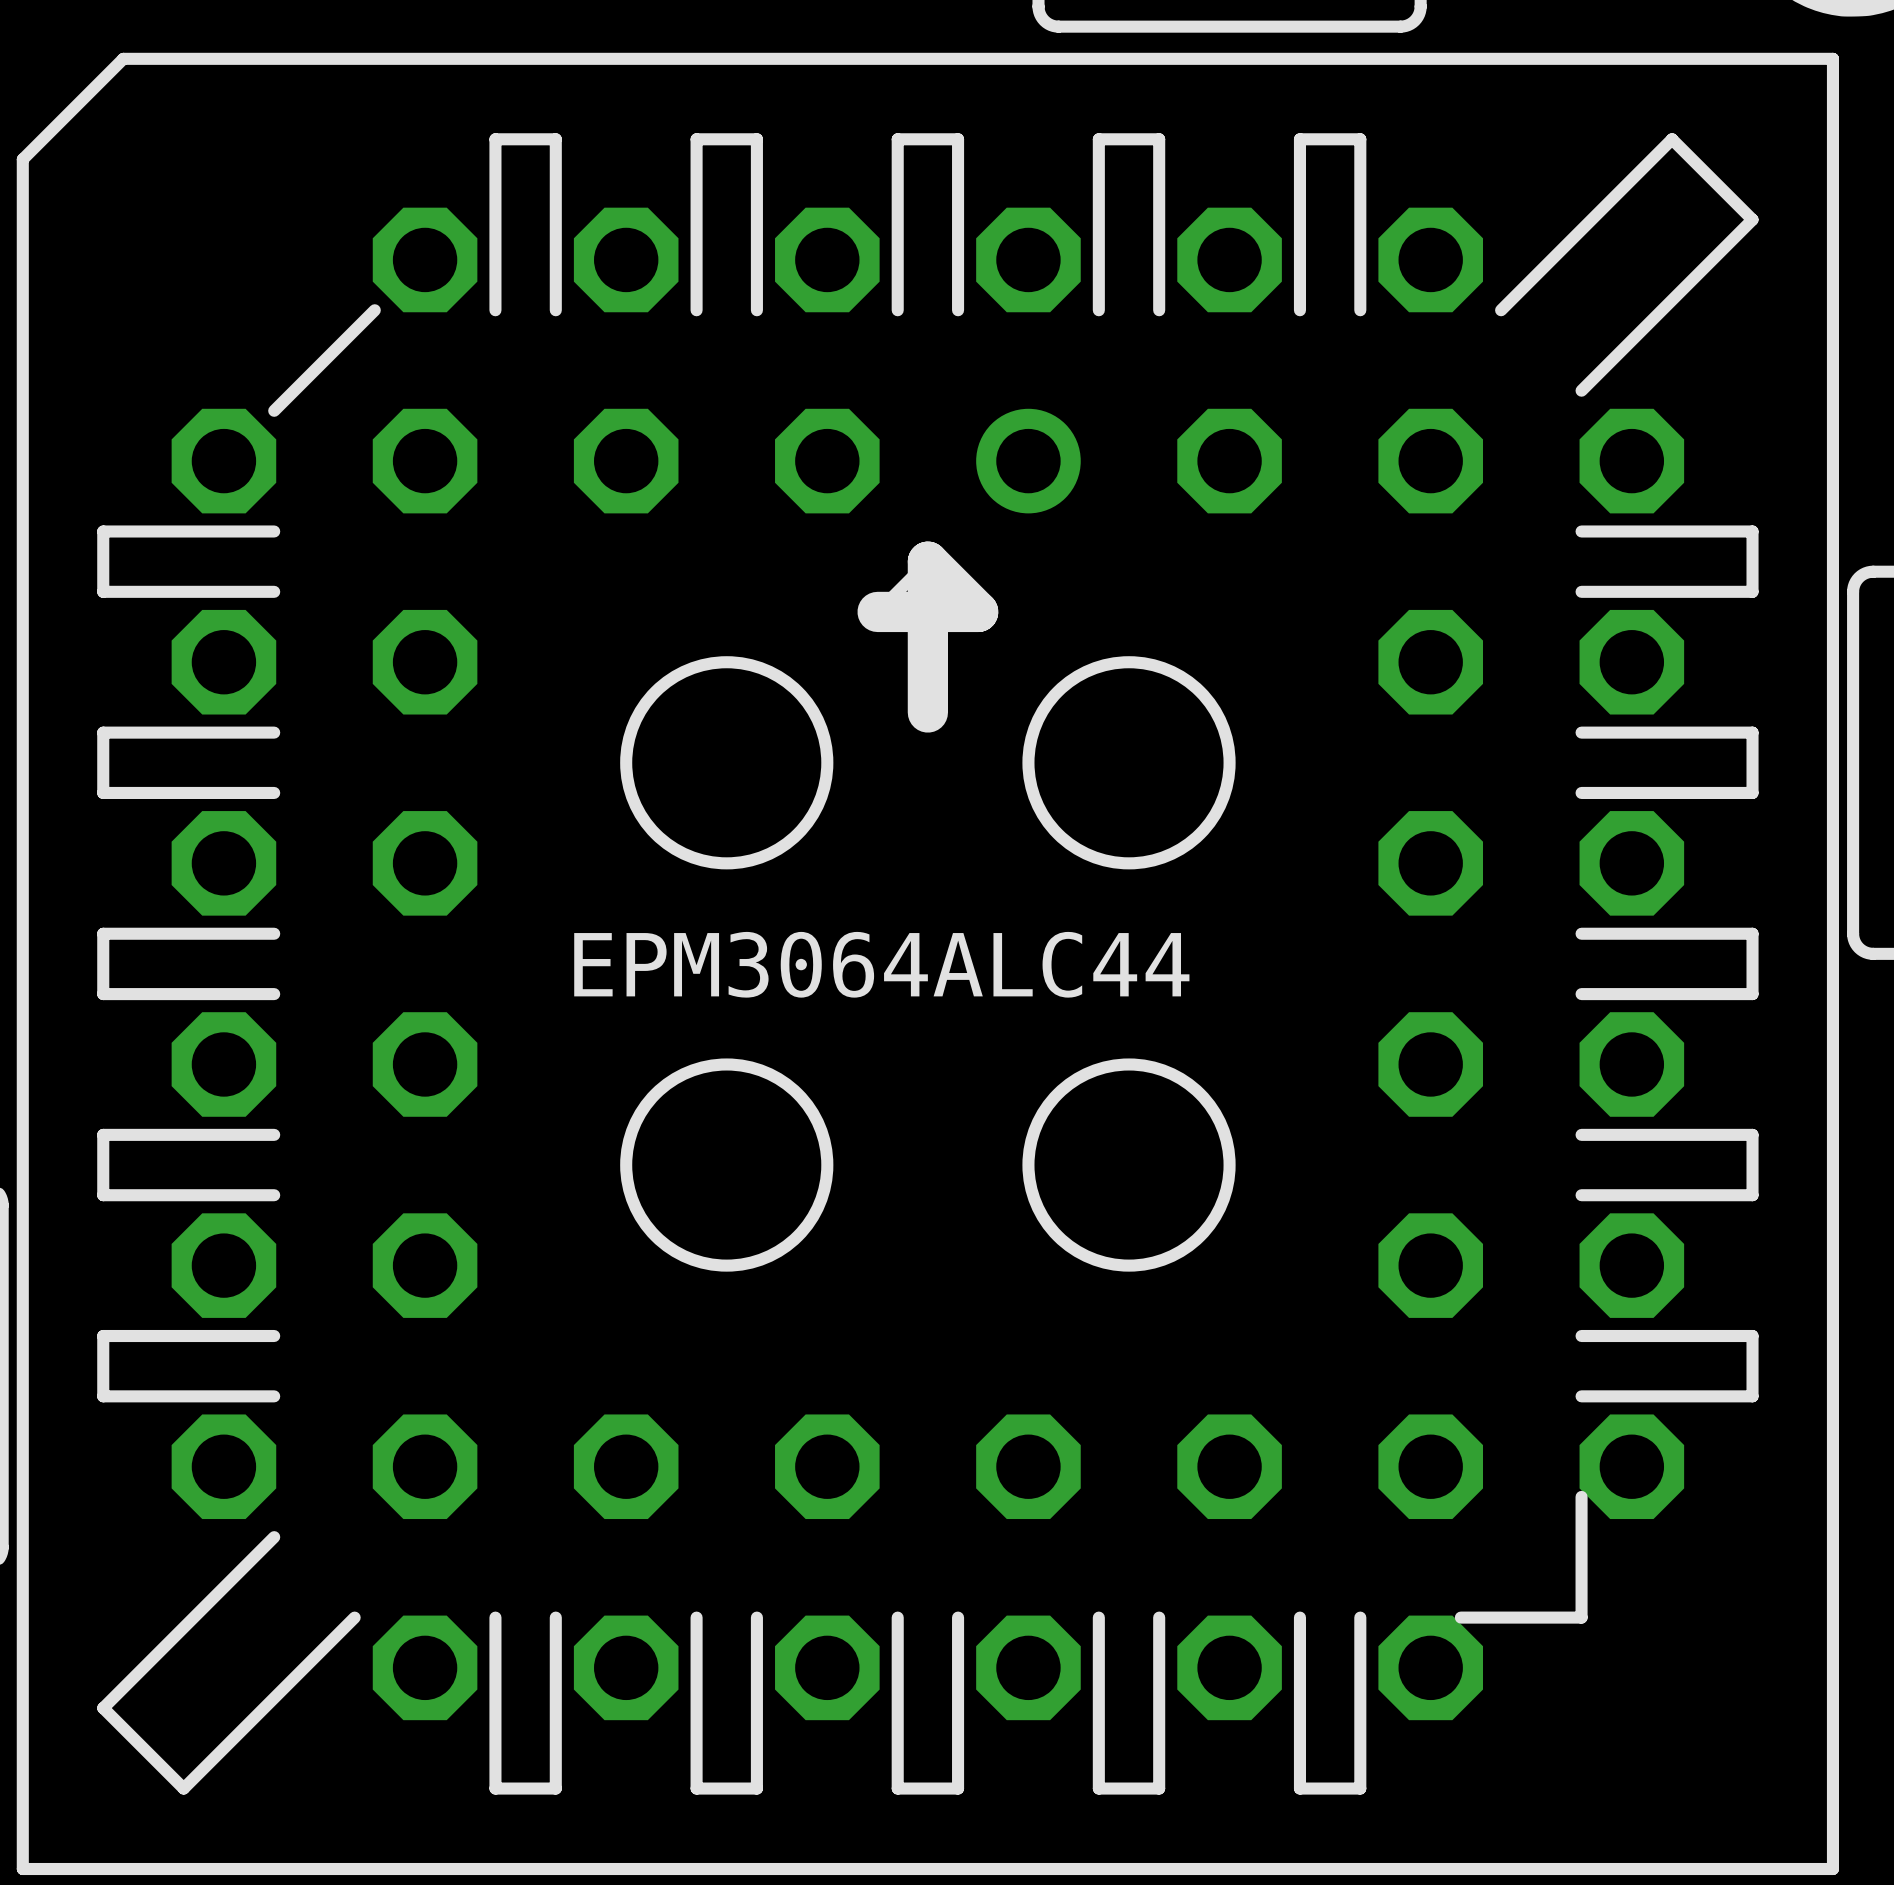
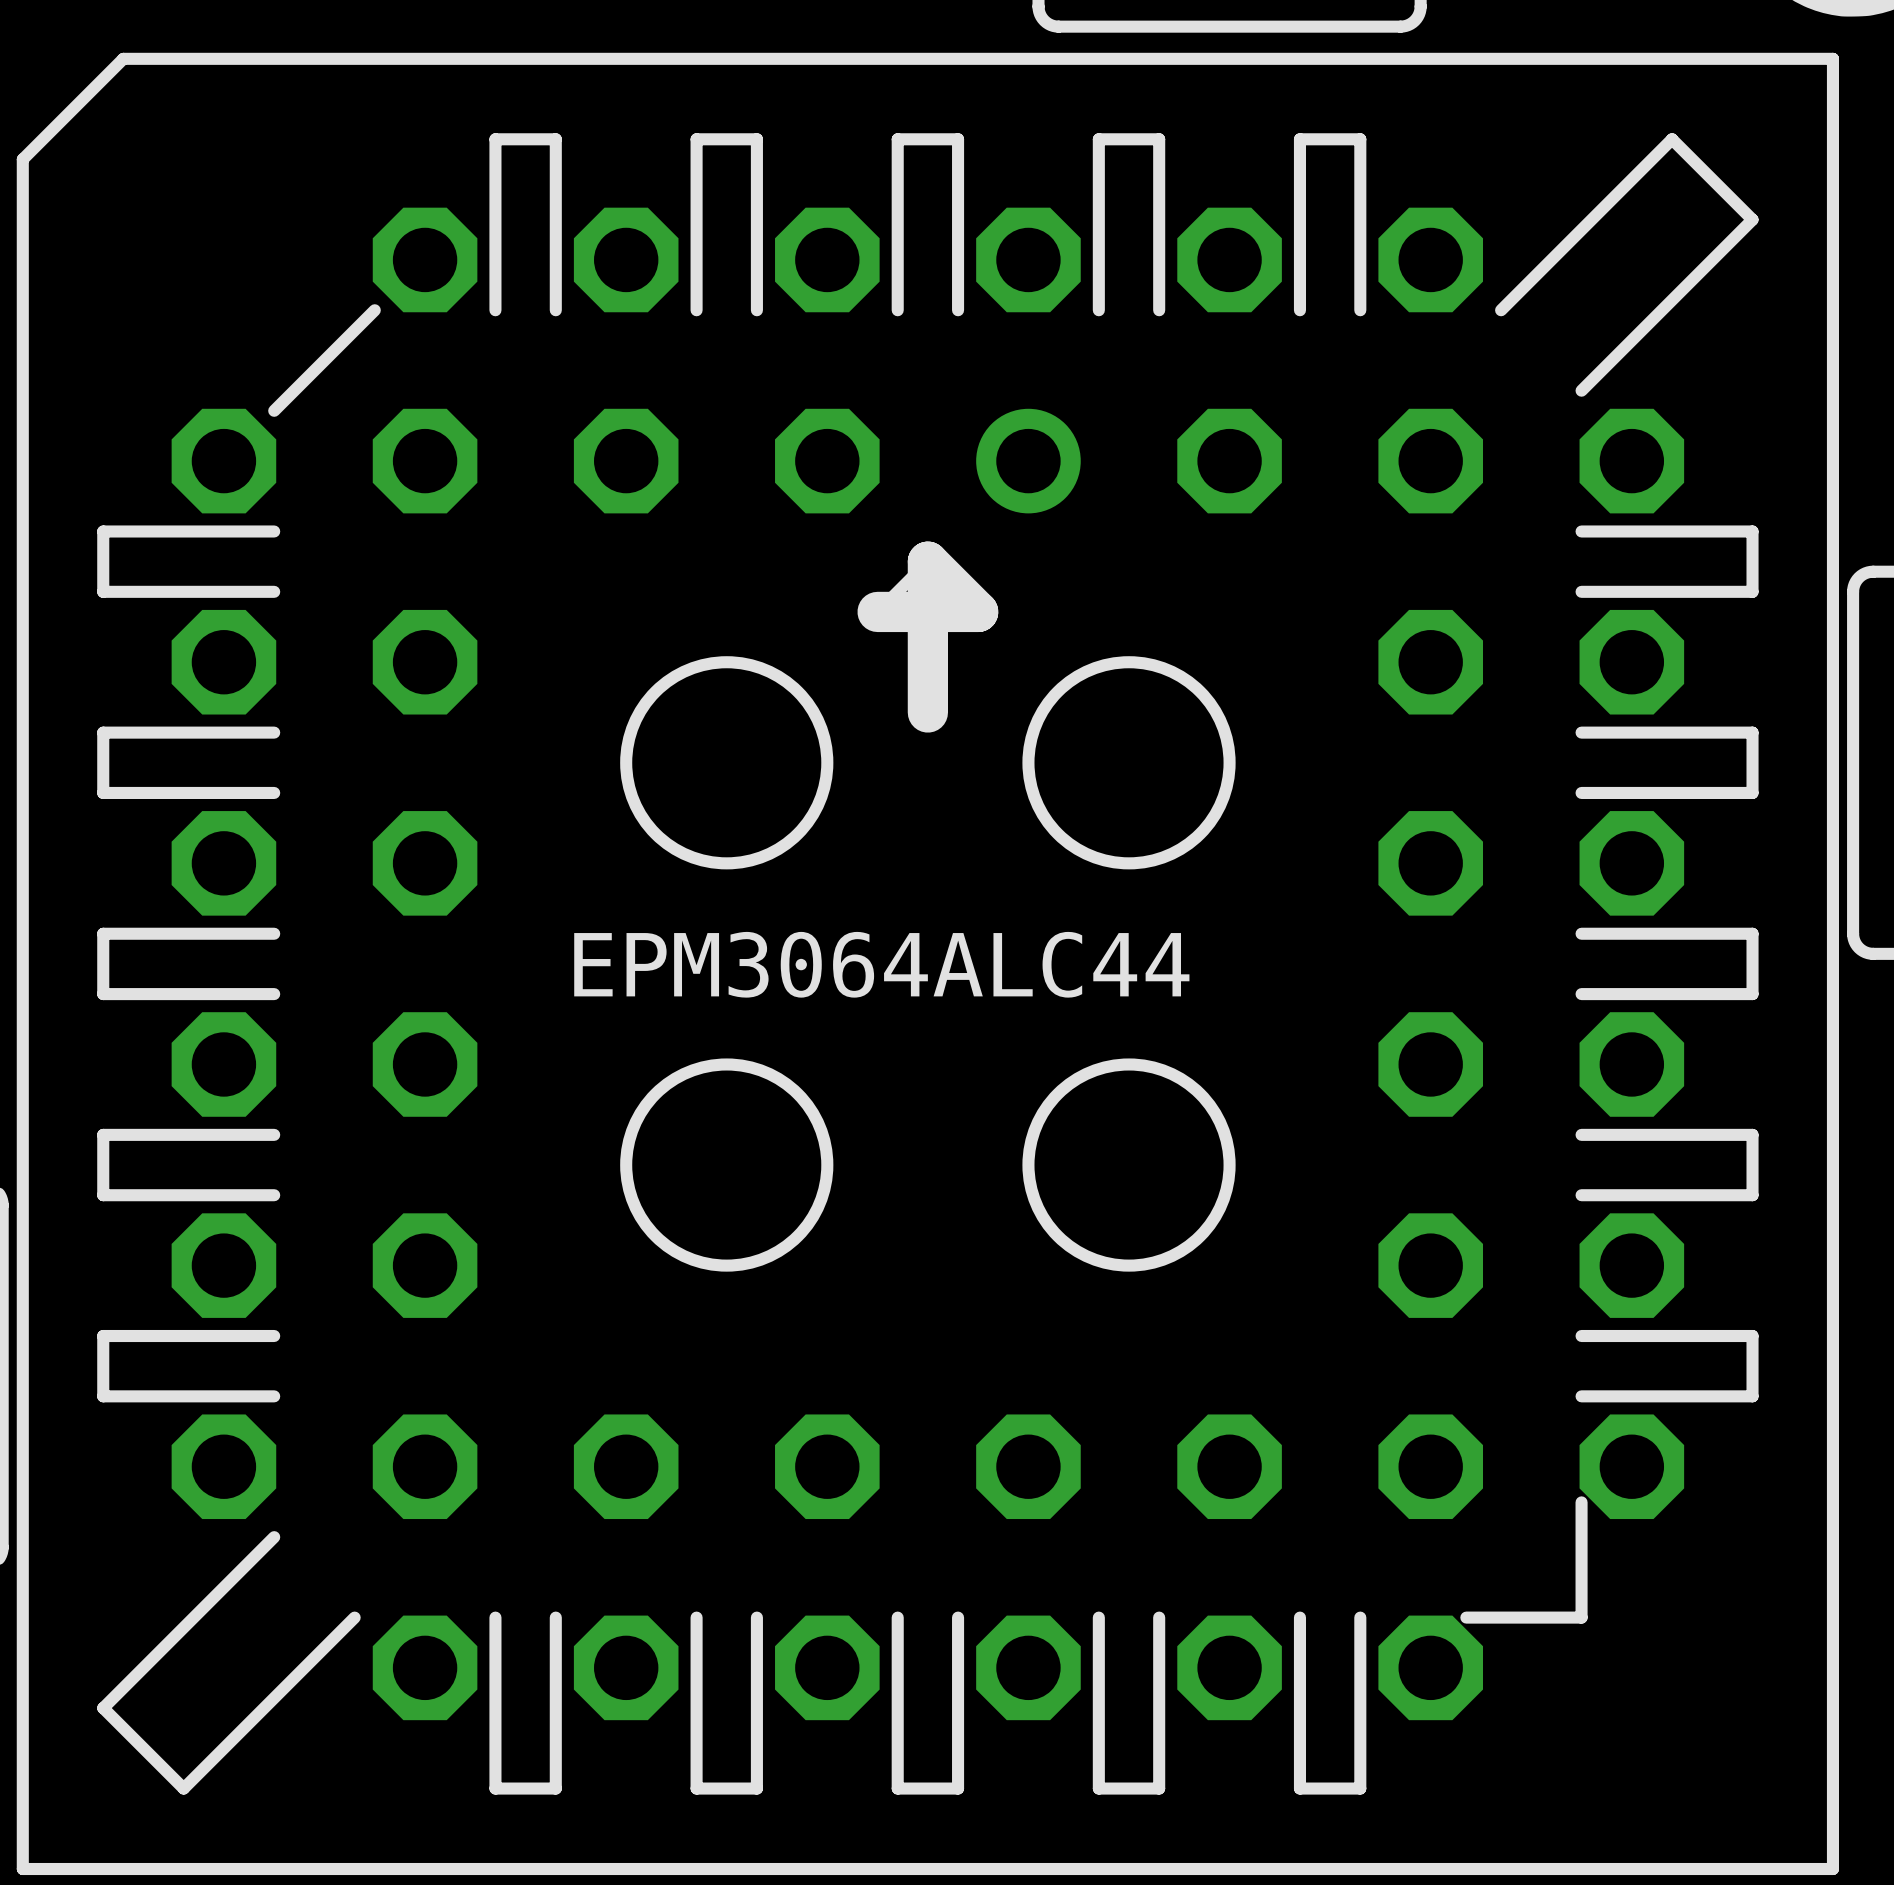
part footprint: [16, 52, 1840, 1876] -> [16, 52, 1840, 1876]

